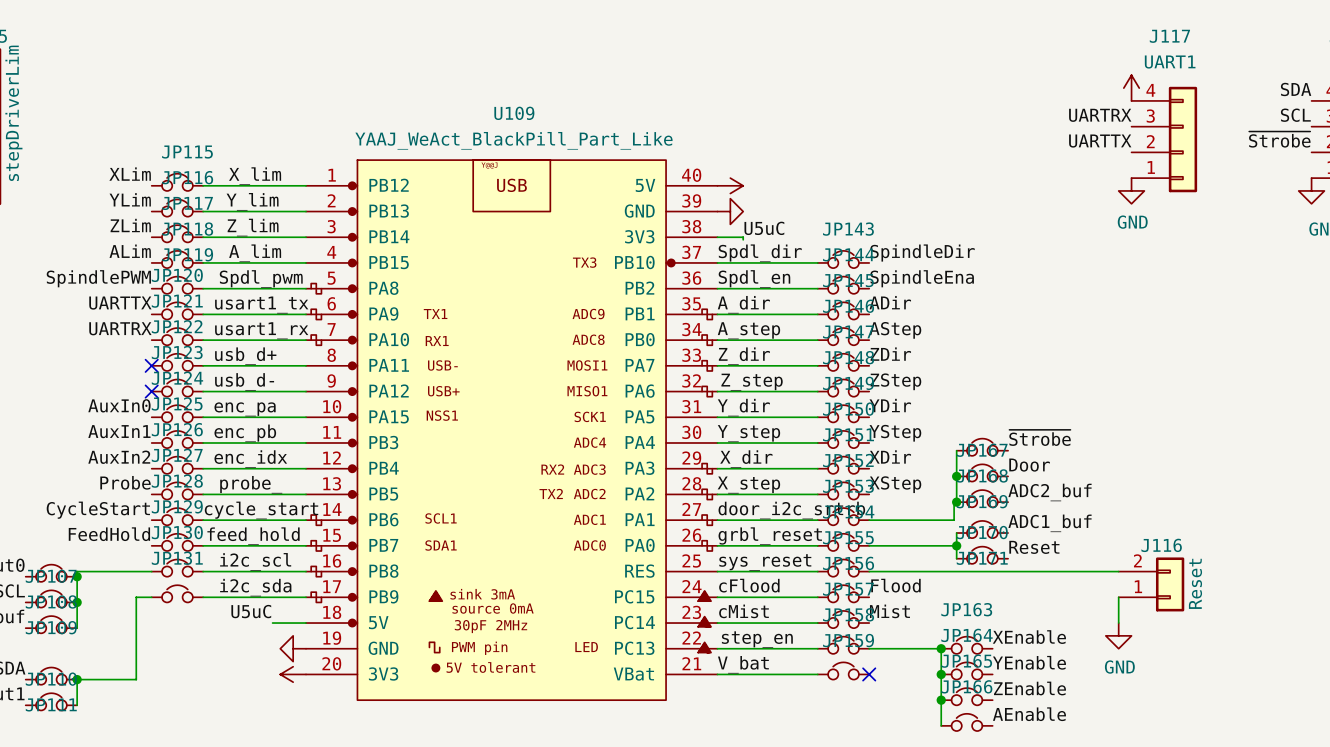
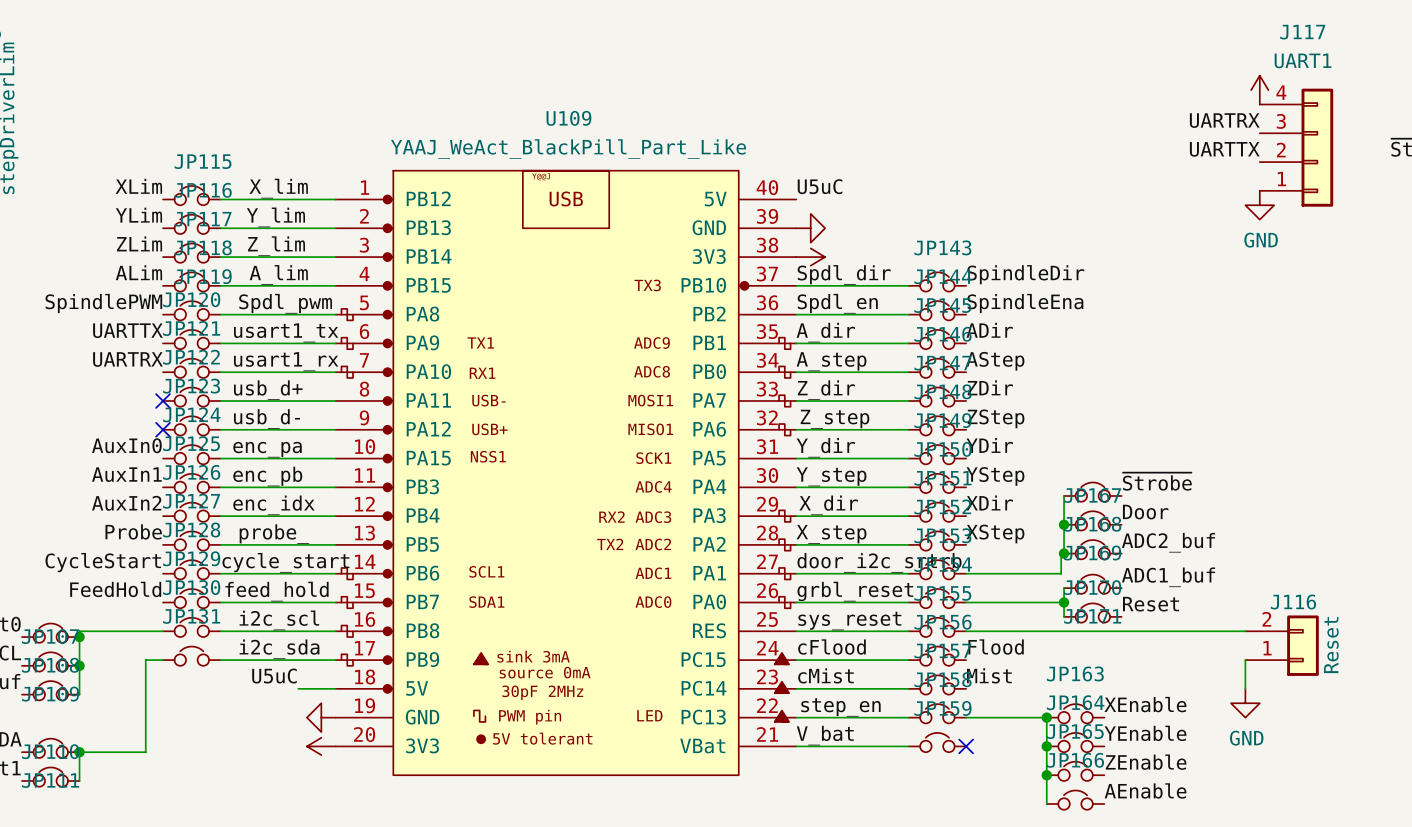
power symbol position: (730, 185) -> (810, 257)
label position: U5uC (764, 228) -> U5uC (820, 186)

